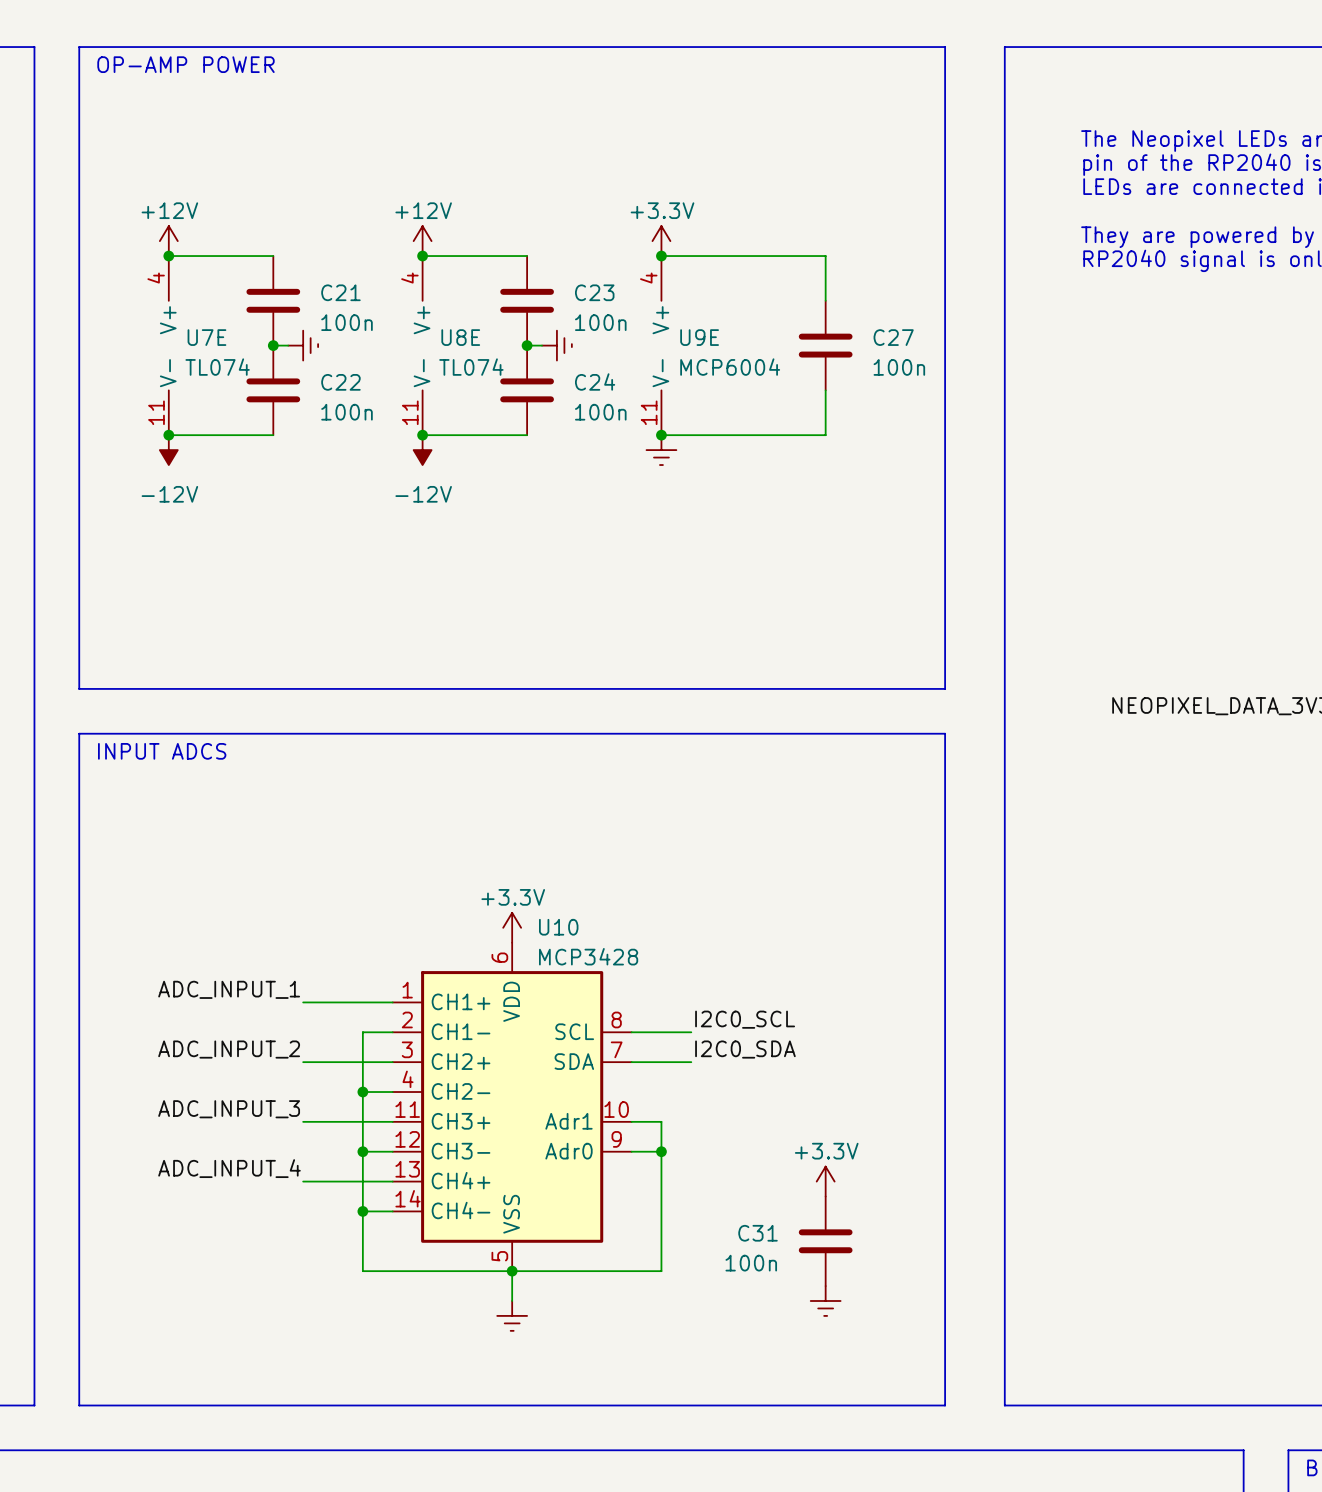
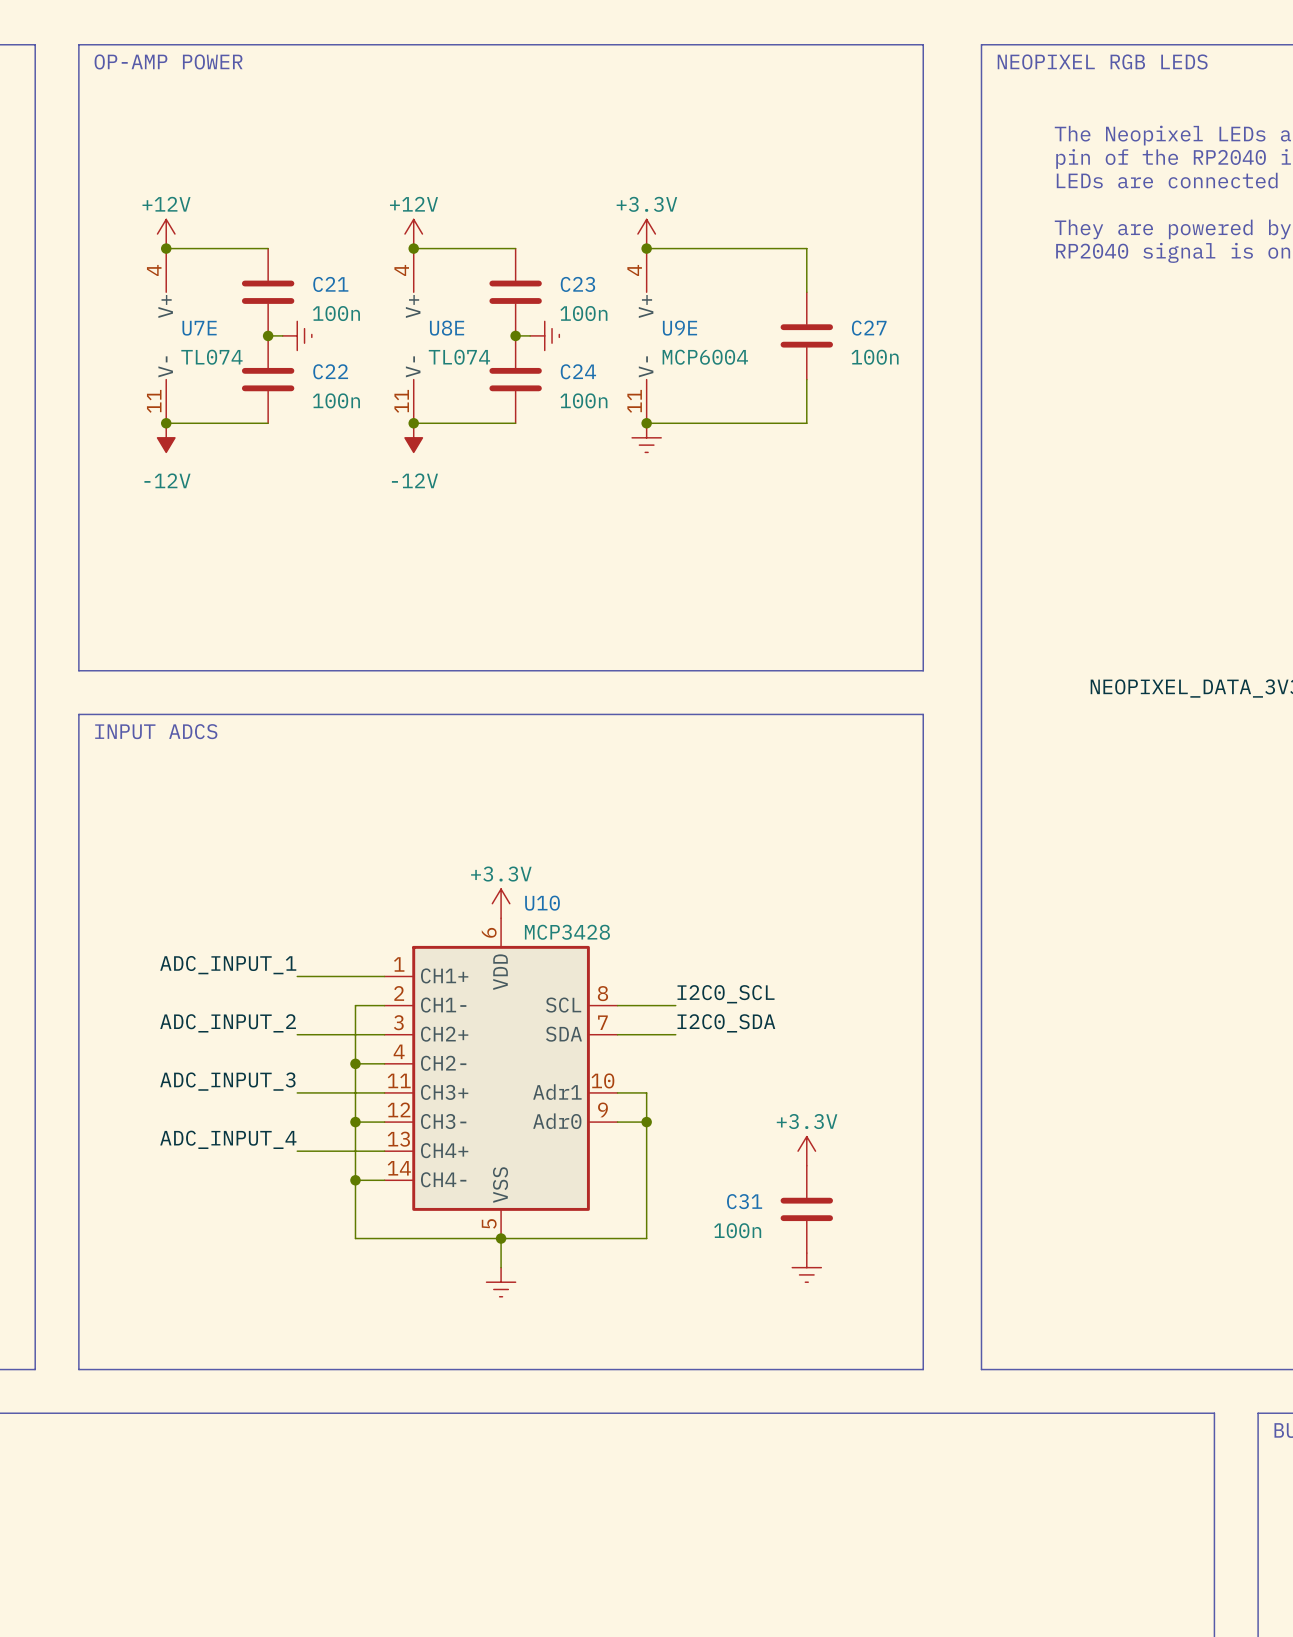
text: none -> NEOPIXEL RGB LEDS (1102, 61)

